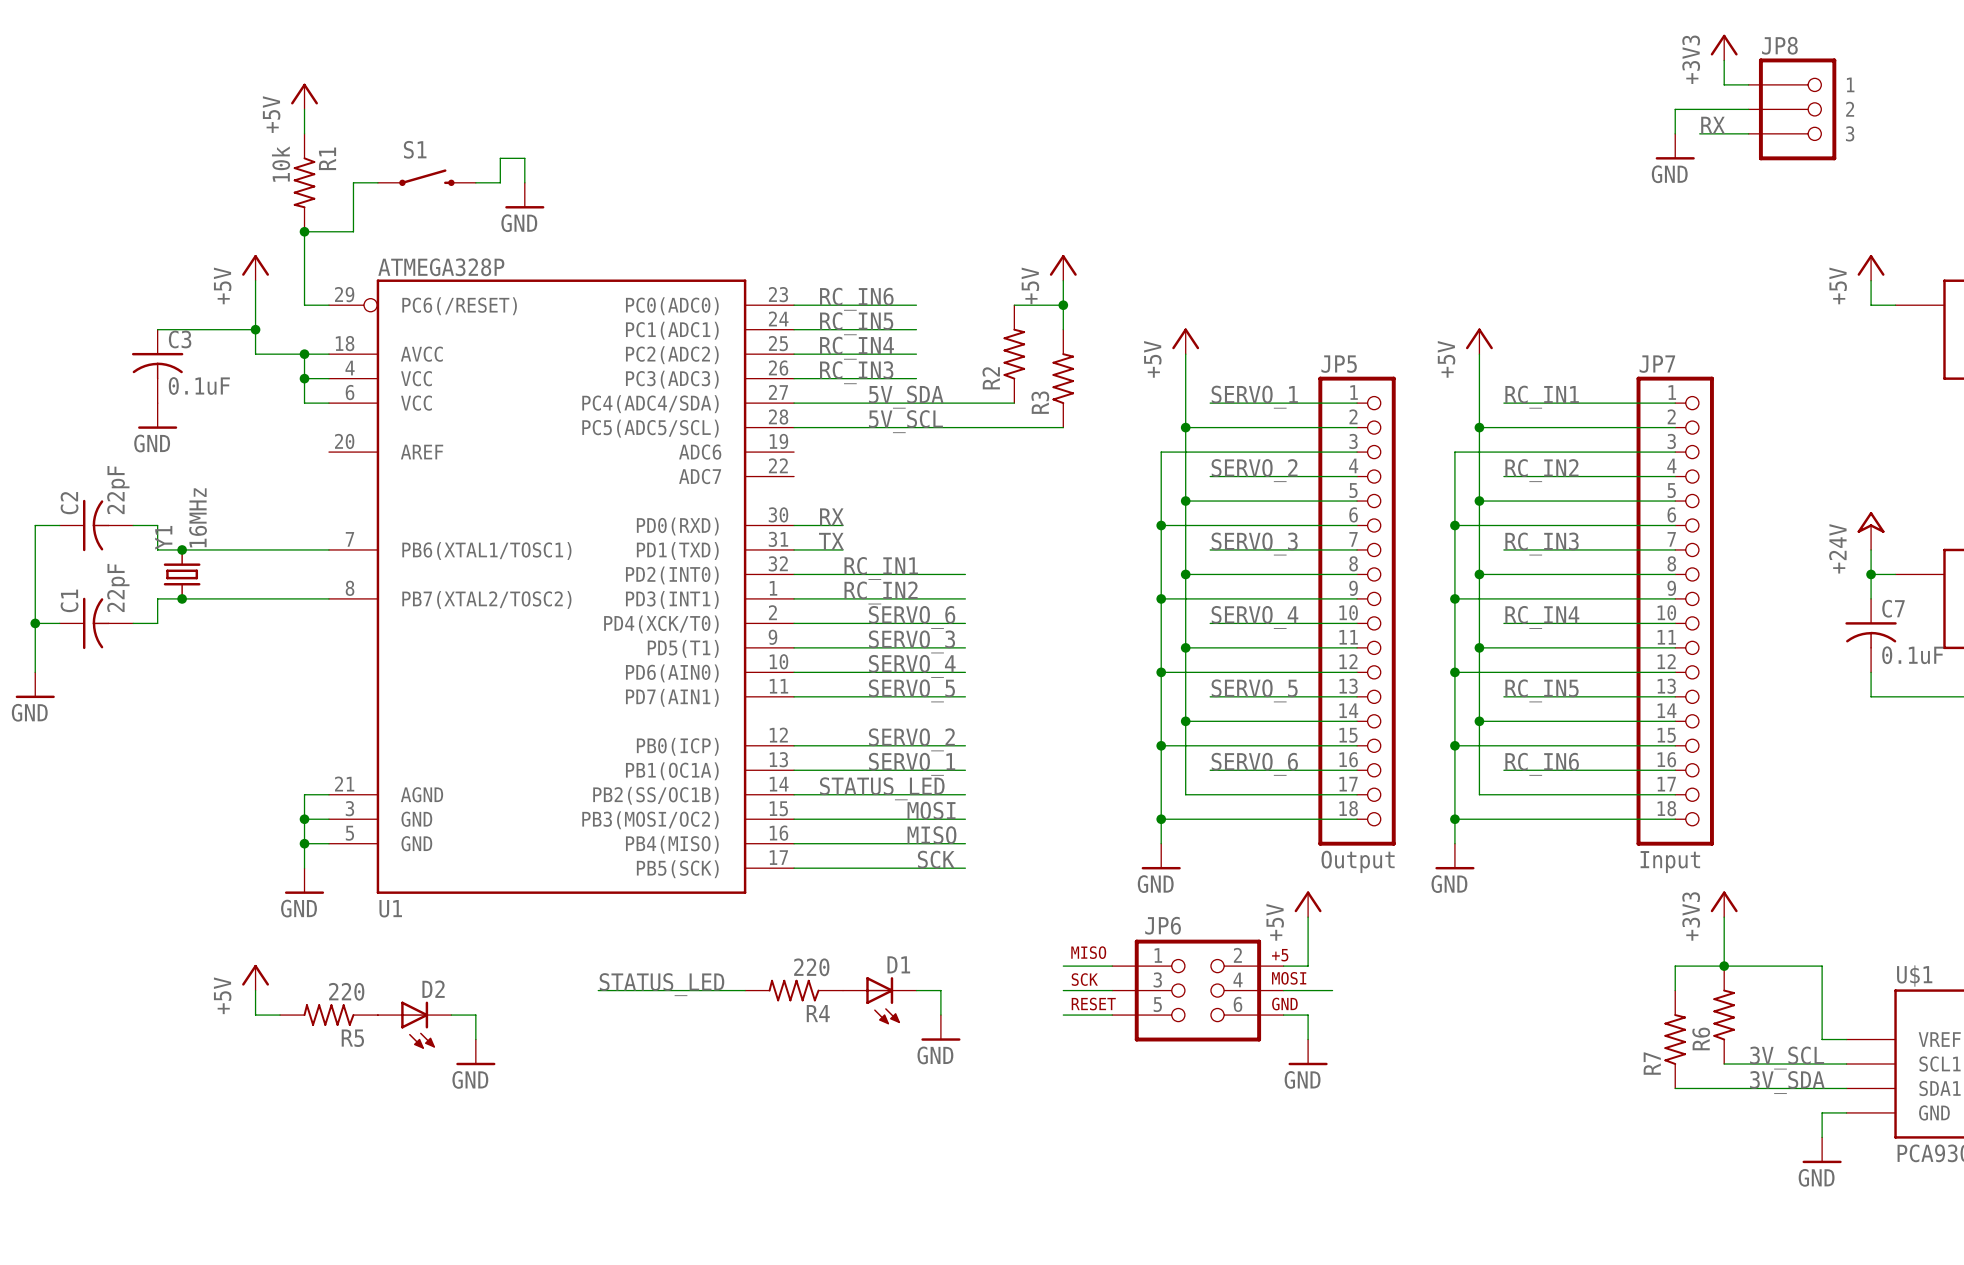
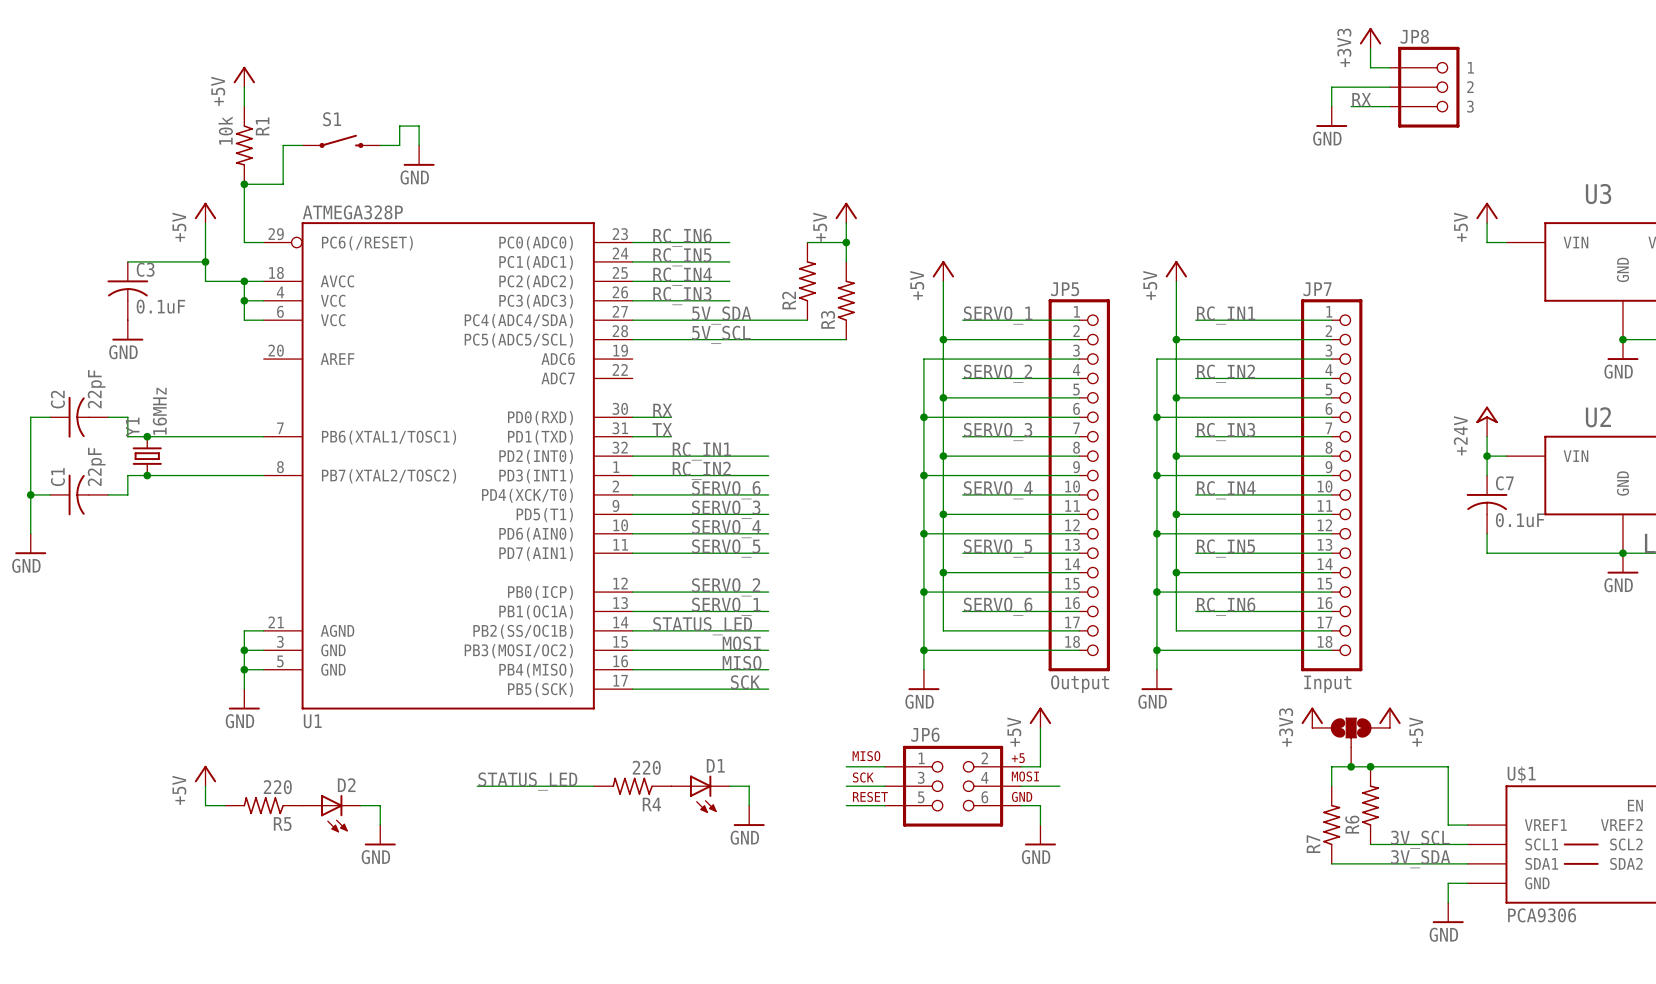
power symbol position: +3V3 (1724, 904) -> +3V3 (1312, 717)
power symbol: none -> +5V (1389, 717)
wire: (1724, 917) (1724, 966) -> none
part: none -> (1351, 742)
junction: none -> (1351, 766)

